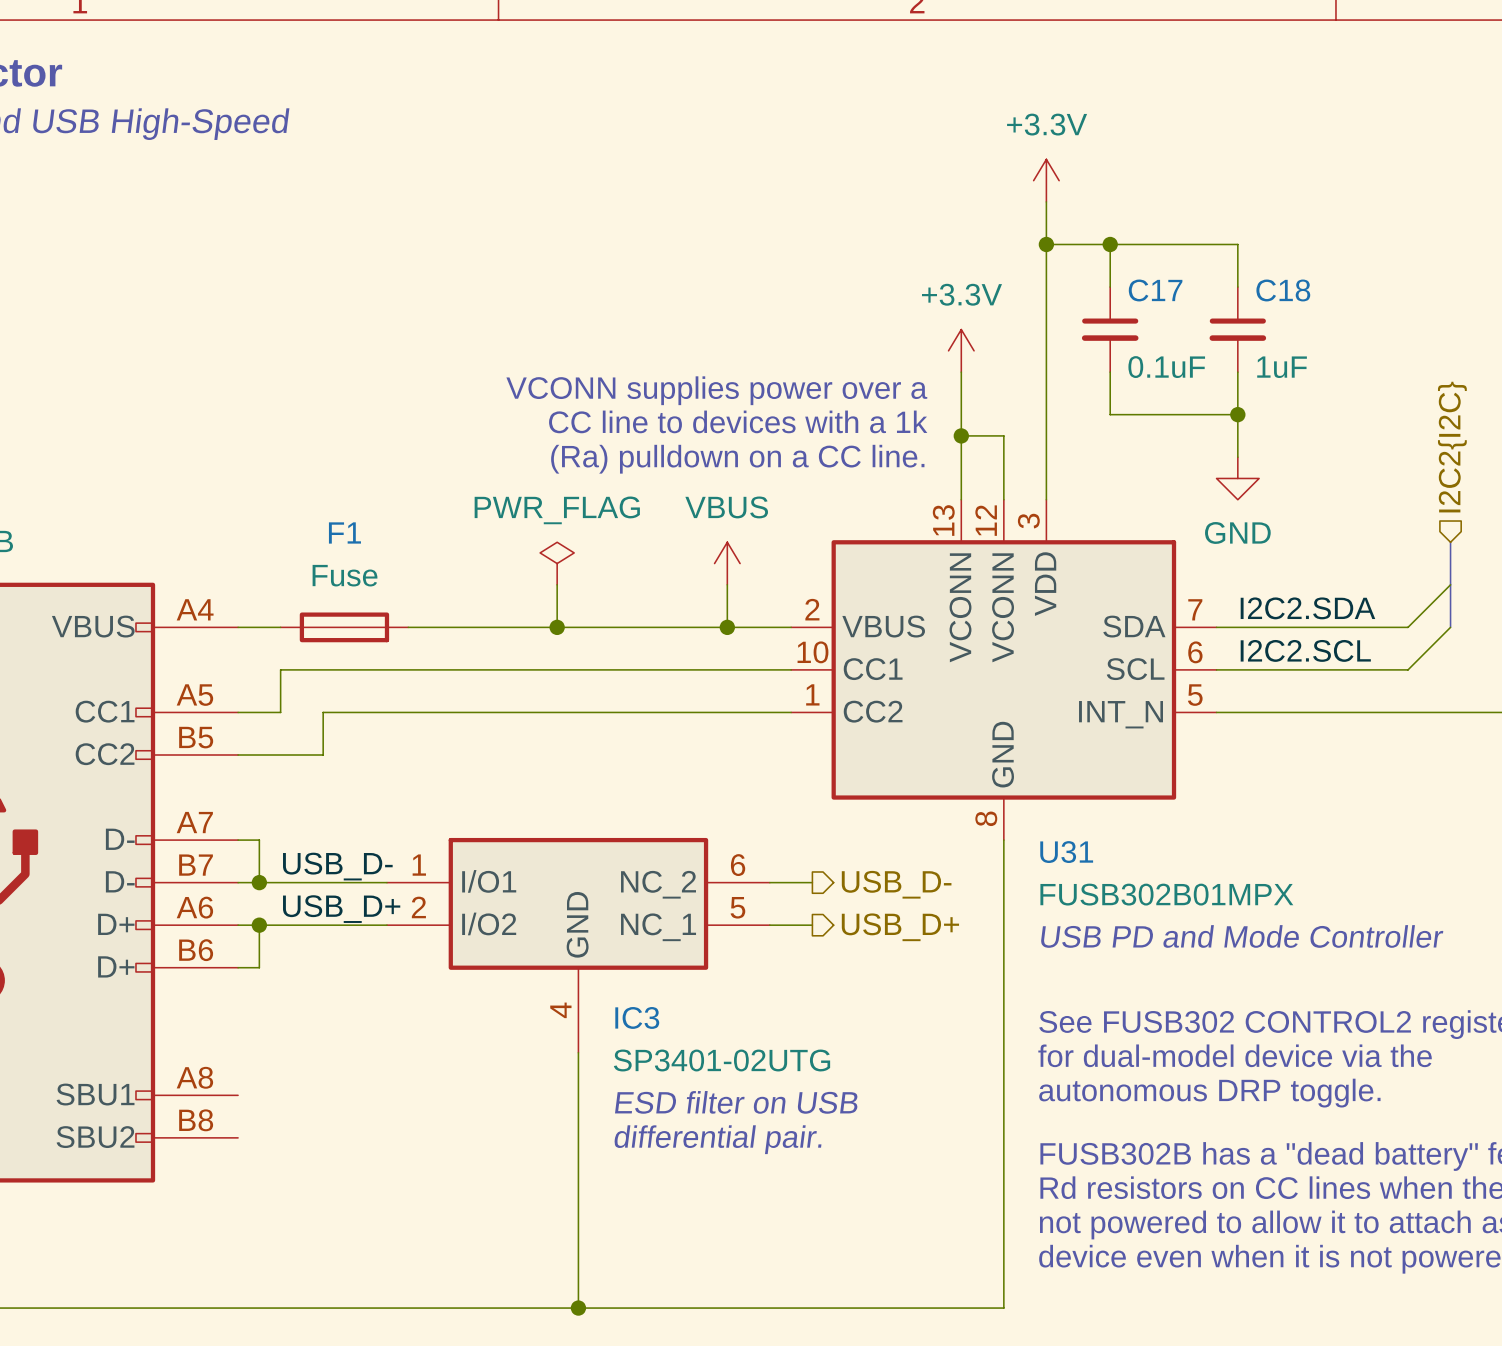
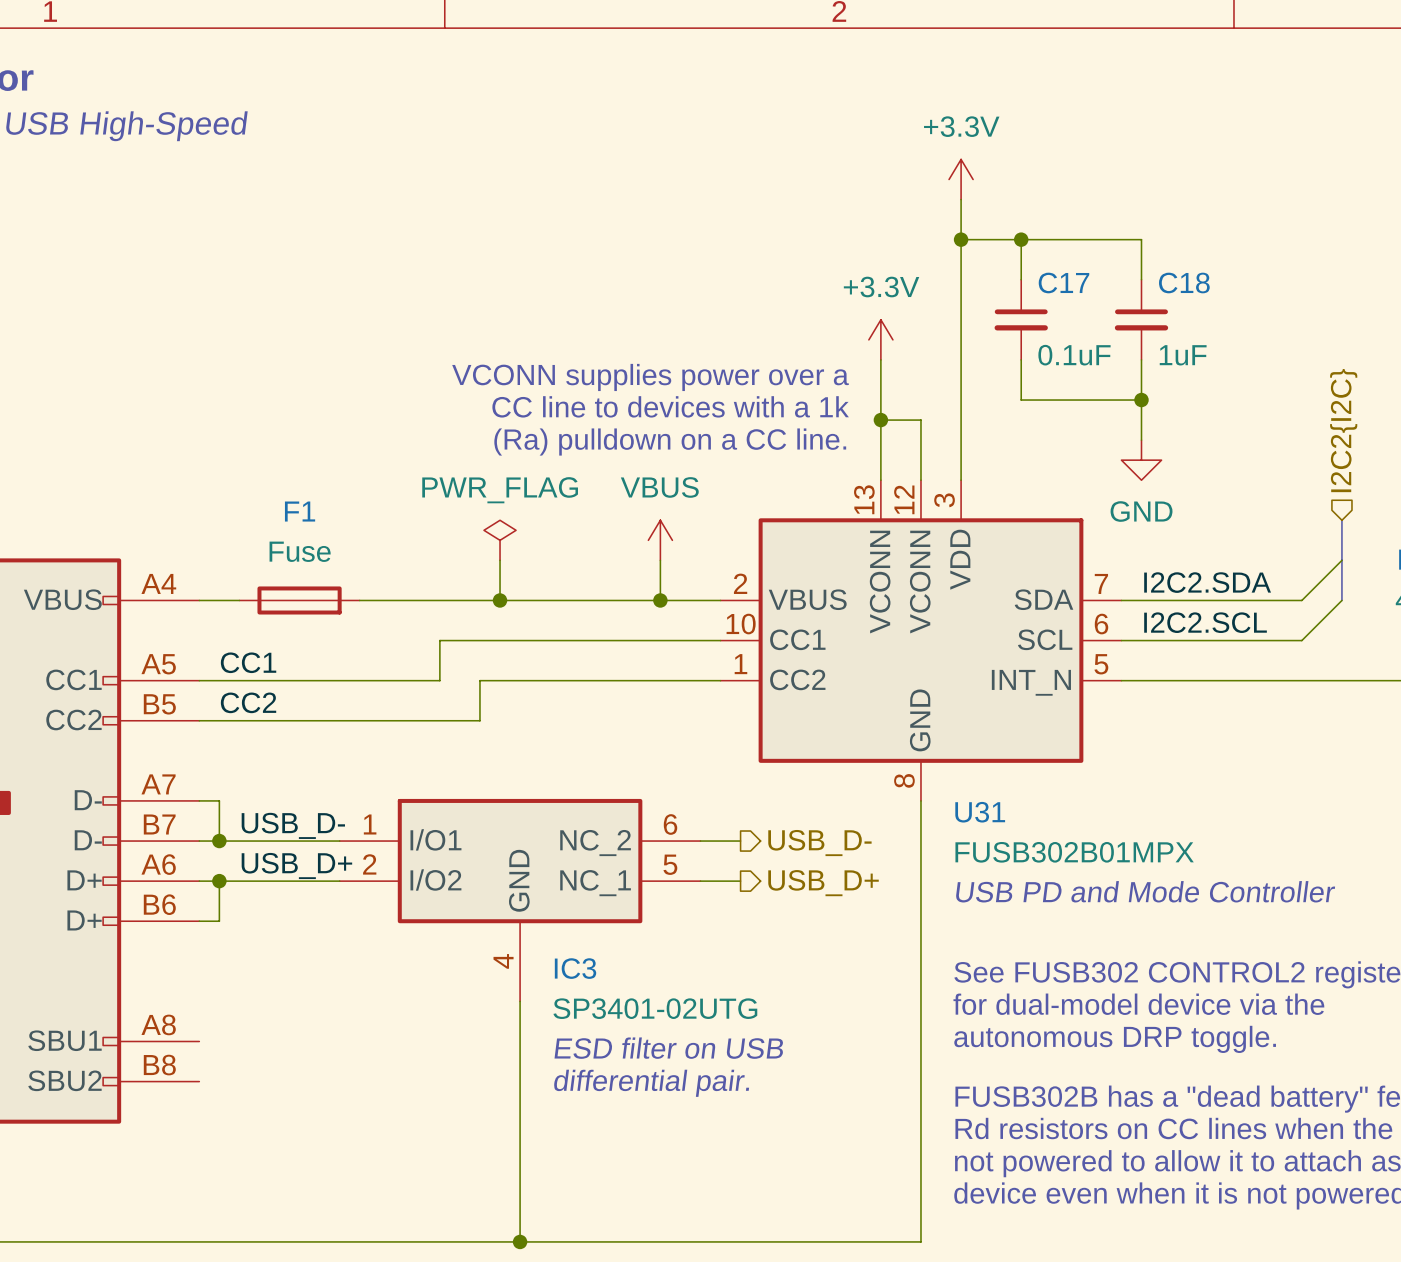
wire: (493, 669) (280, 669) (280, 712) -> none
label: none -> CC1 (248, 662)
wire: (323, 712) (323, 755) -> (279, 680) (239, 680)
wire: (493, 712) (535, 712) -> (439, 680) (439, 640)
wire: none -> (479, 680) (479, 720) (279, 720)
label: none -> CC2 (248, 702)

